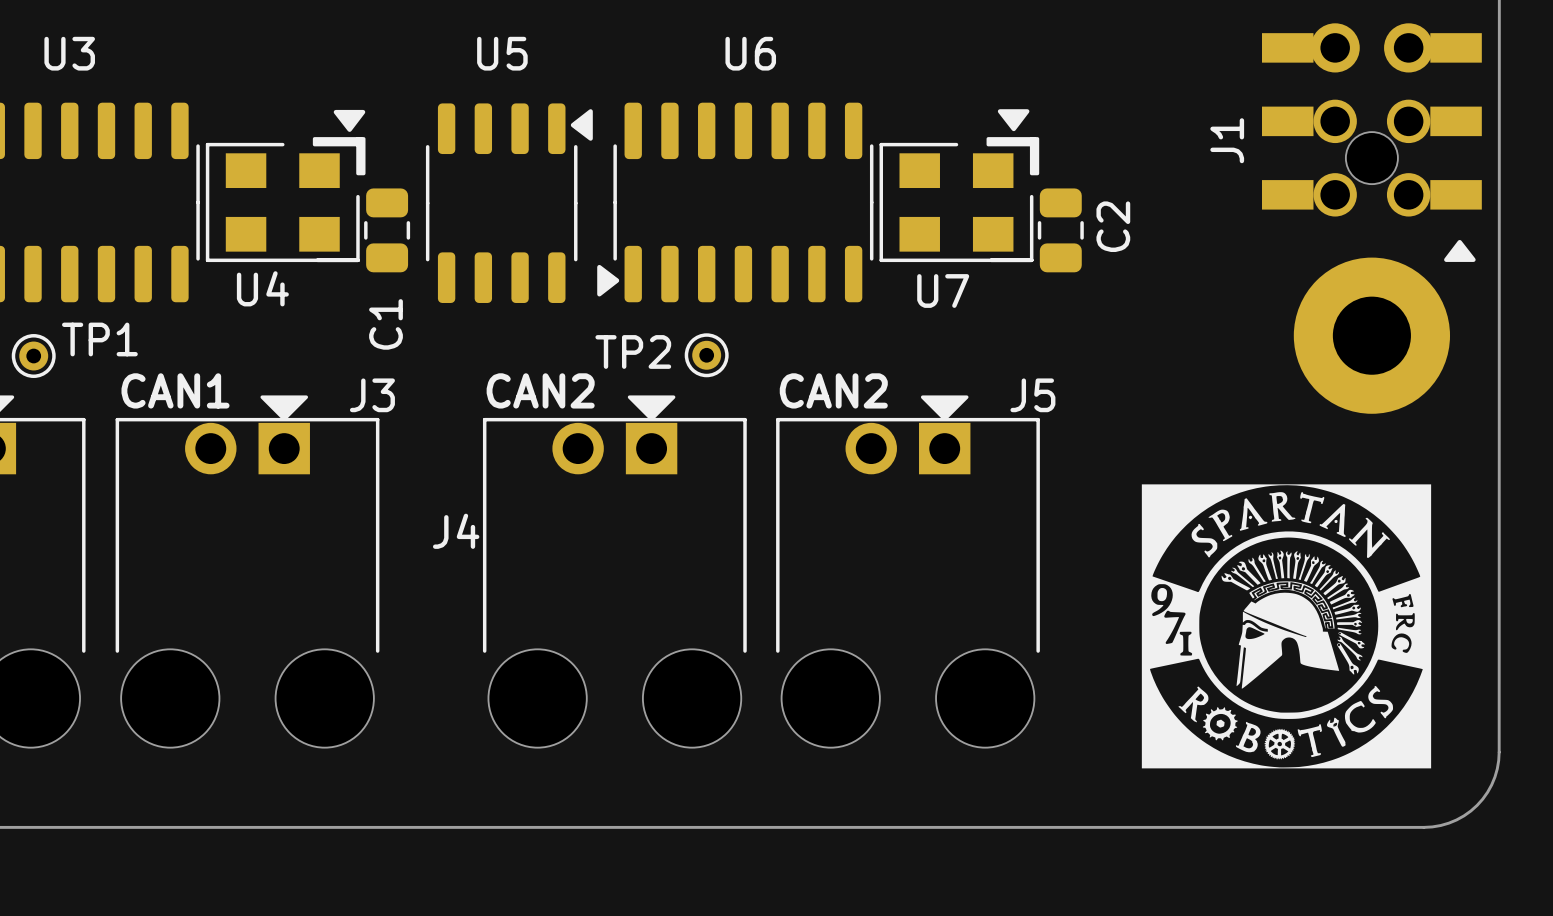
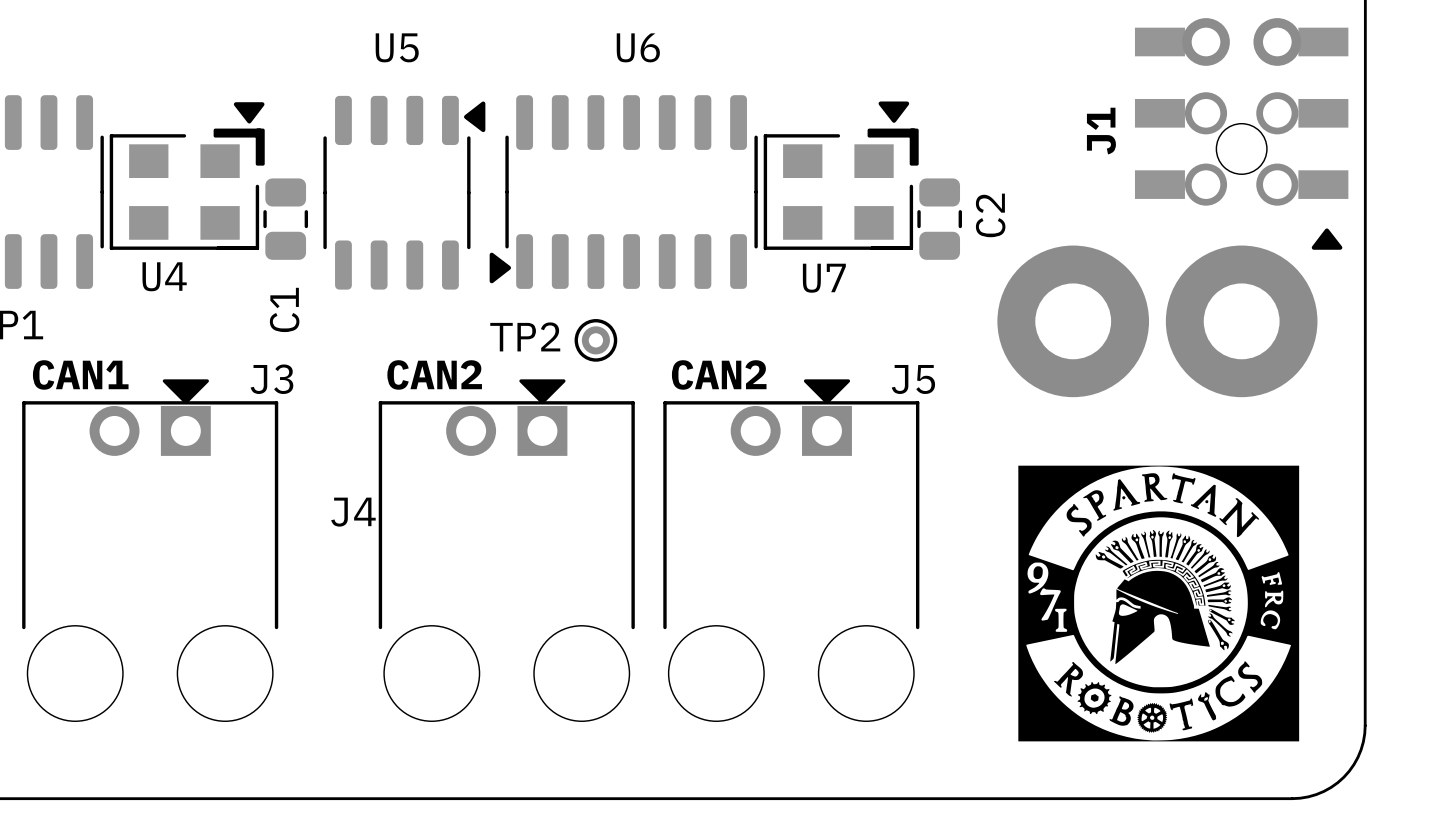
part: none -> (1073, 321)

